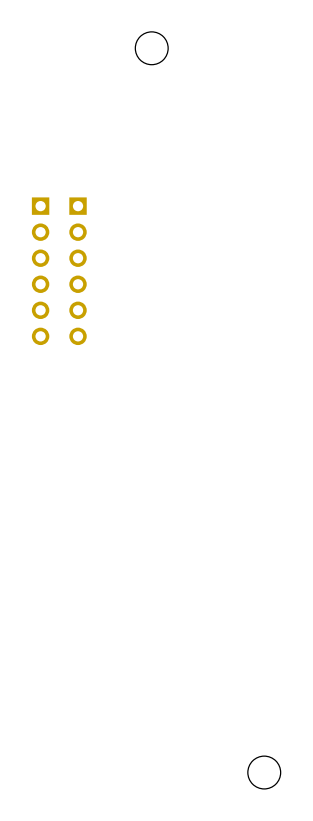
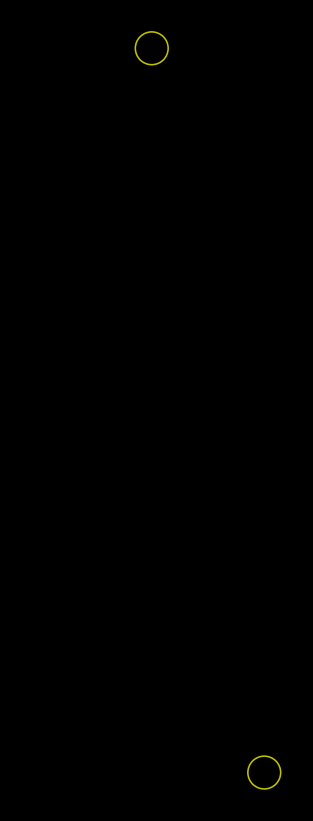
part: (40, 271) -> none
part: (78, 271) -> none

